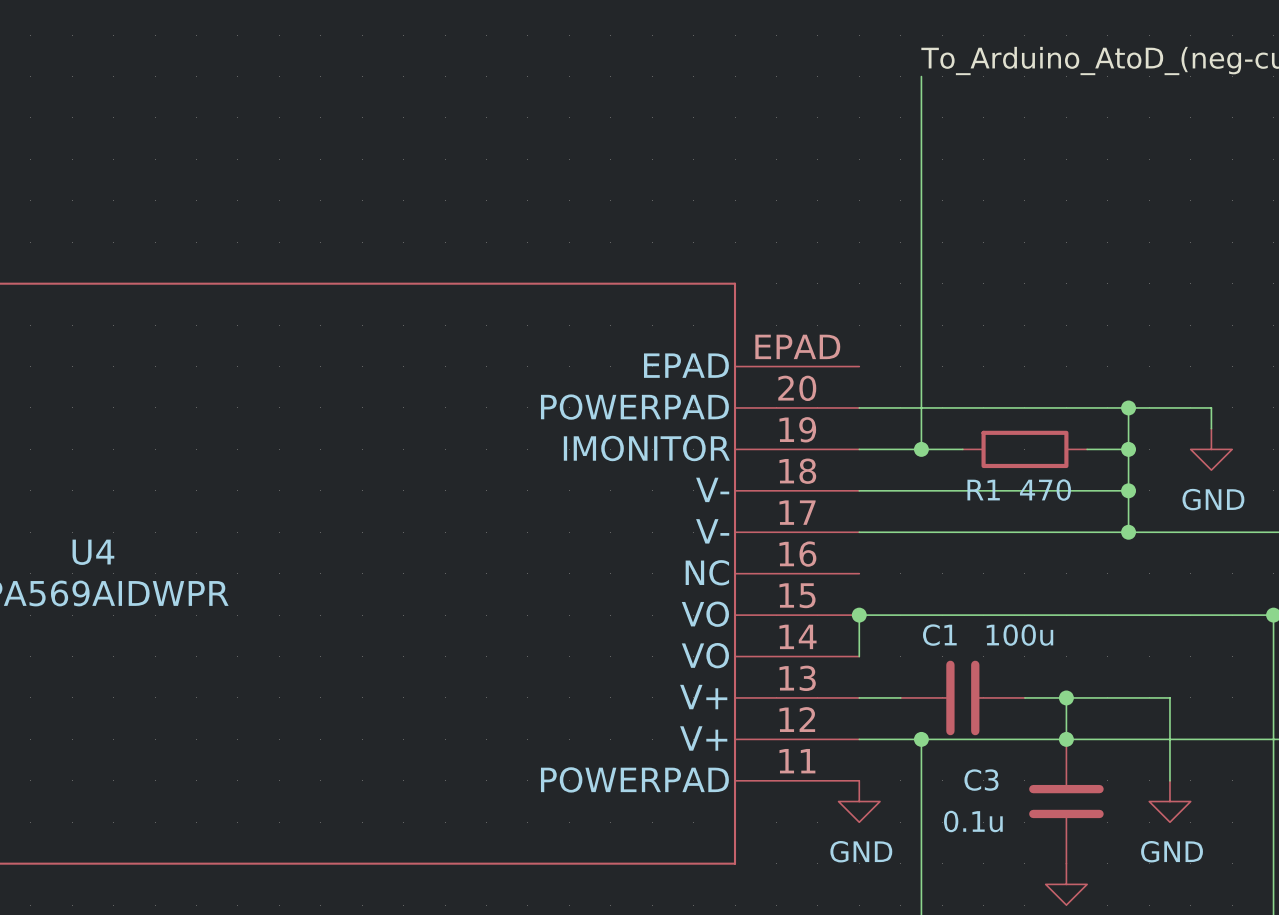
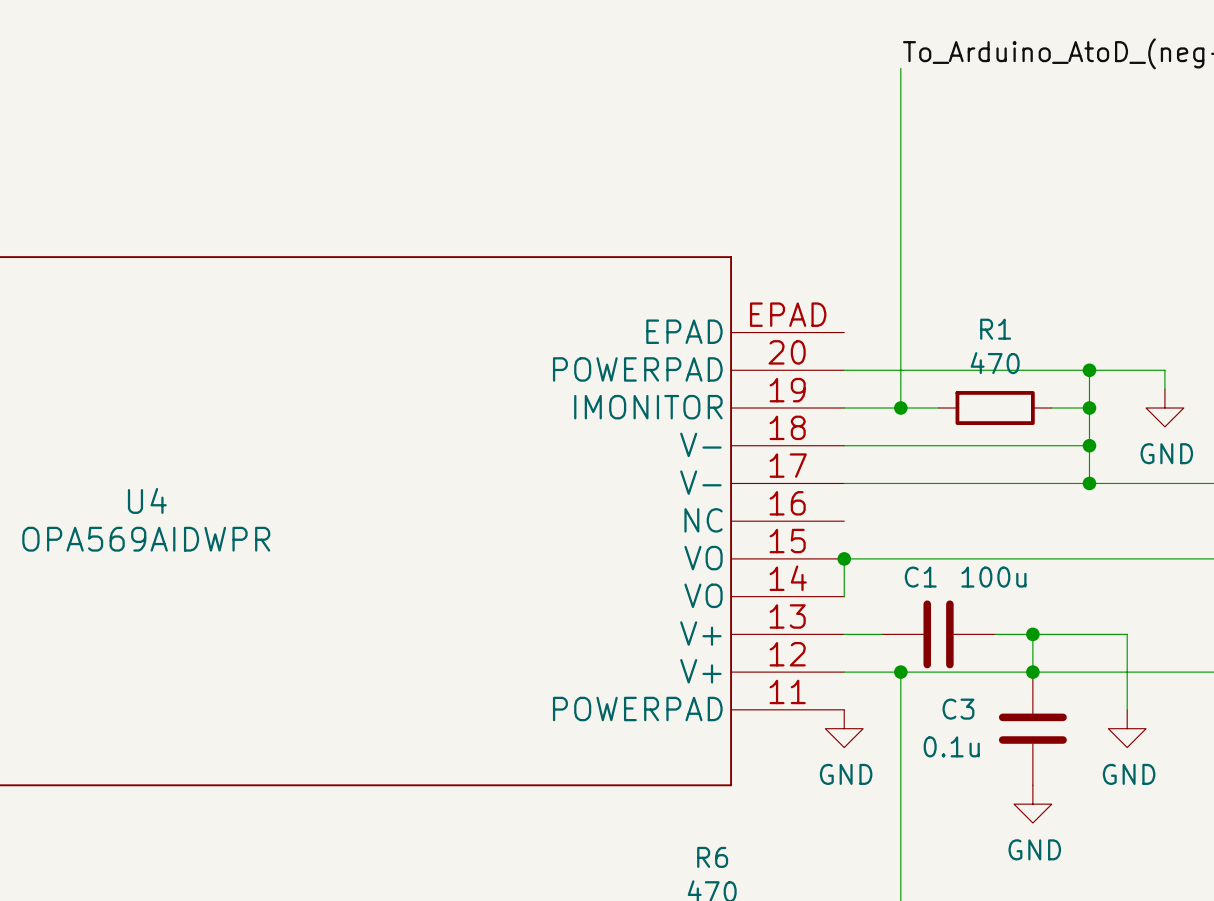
R1 name position: R1 (983, 490) -> R1 (995, 329)
R1 value position: 470 (1045, 490) -> 470 (995, 363)

